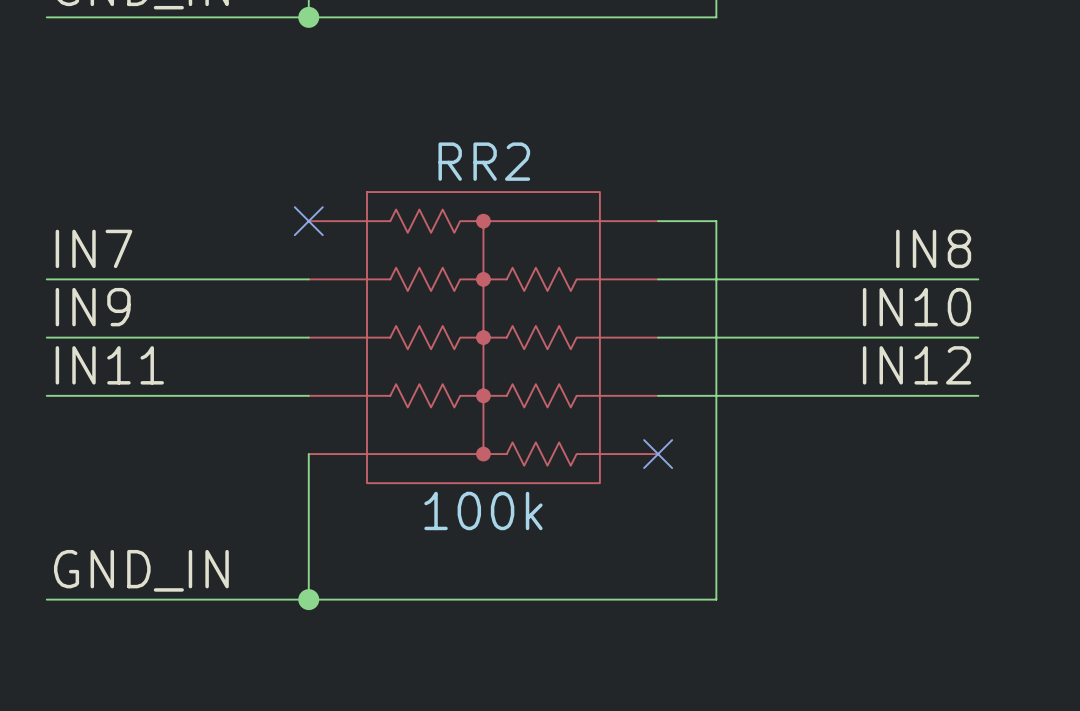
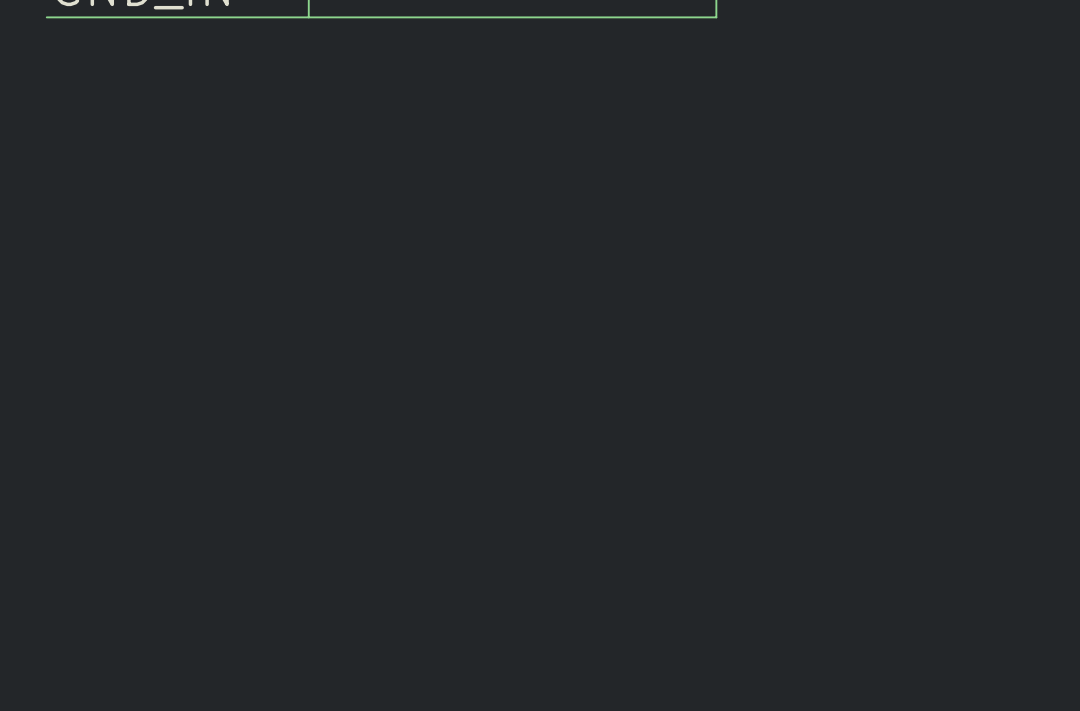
junction: (308, 17) -> none
no-connect mark: (308, 221) -> none
wire: (658, 221) (716, 221) (716, 599) (46, 599) -> none
label: IN7 (93, 248) -> none
label: IN8 (933, 248) -> none
wire: (46, 279) (308, 279) -> none
wire: (658, 279) (978, 279) -> none
label: IN9 (93, 307) -> none
label: IN10 (917, 307) -> none
wire: (46, 337) (308, 337) -> none
RR2: 100k (483, 337) -> none
wire: (658, 337) (978, 337) -> none
label: IN11 (109, 365) -> none
label: IN12 (917, 365) -> none
wire: (46, 395) (308, 395) -> none
wire: (658, 395) (978, 395) -> none
wire: (308, 454) (308, 599) -> none
no-connect mark: (658, 454) -> none
label: GND_IN (141, 570) -> none
junction: (308, 599) -> none

